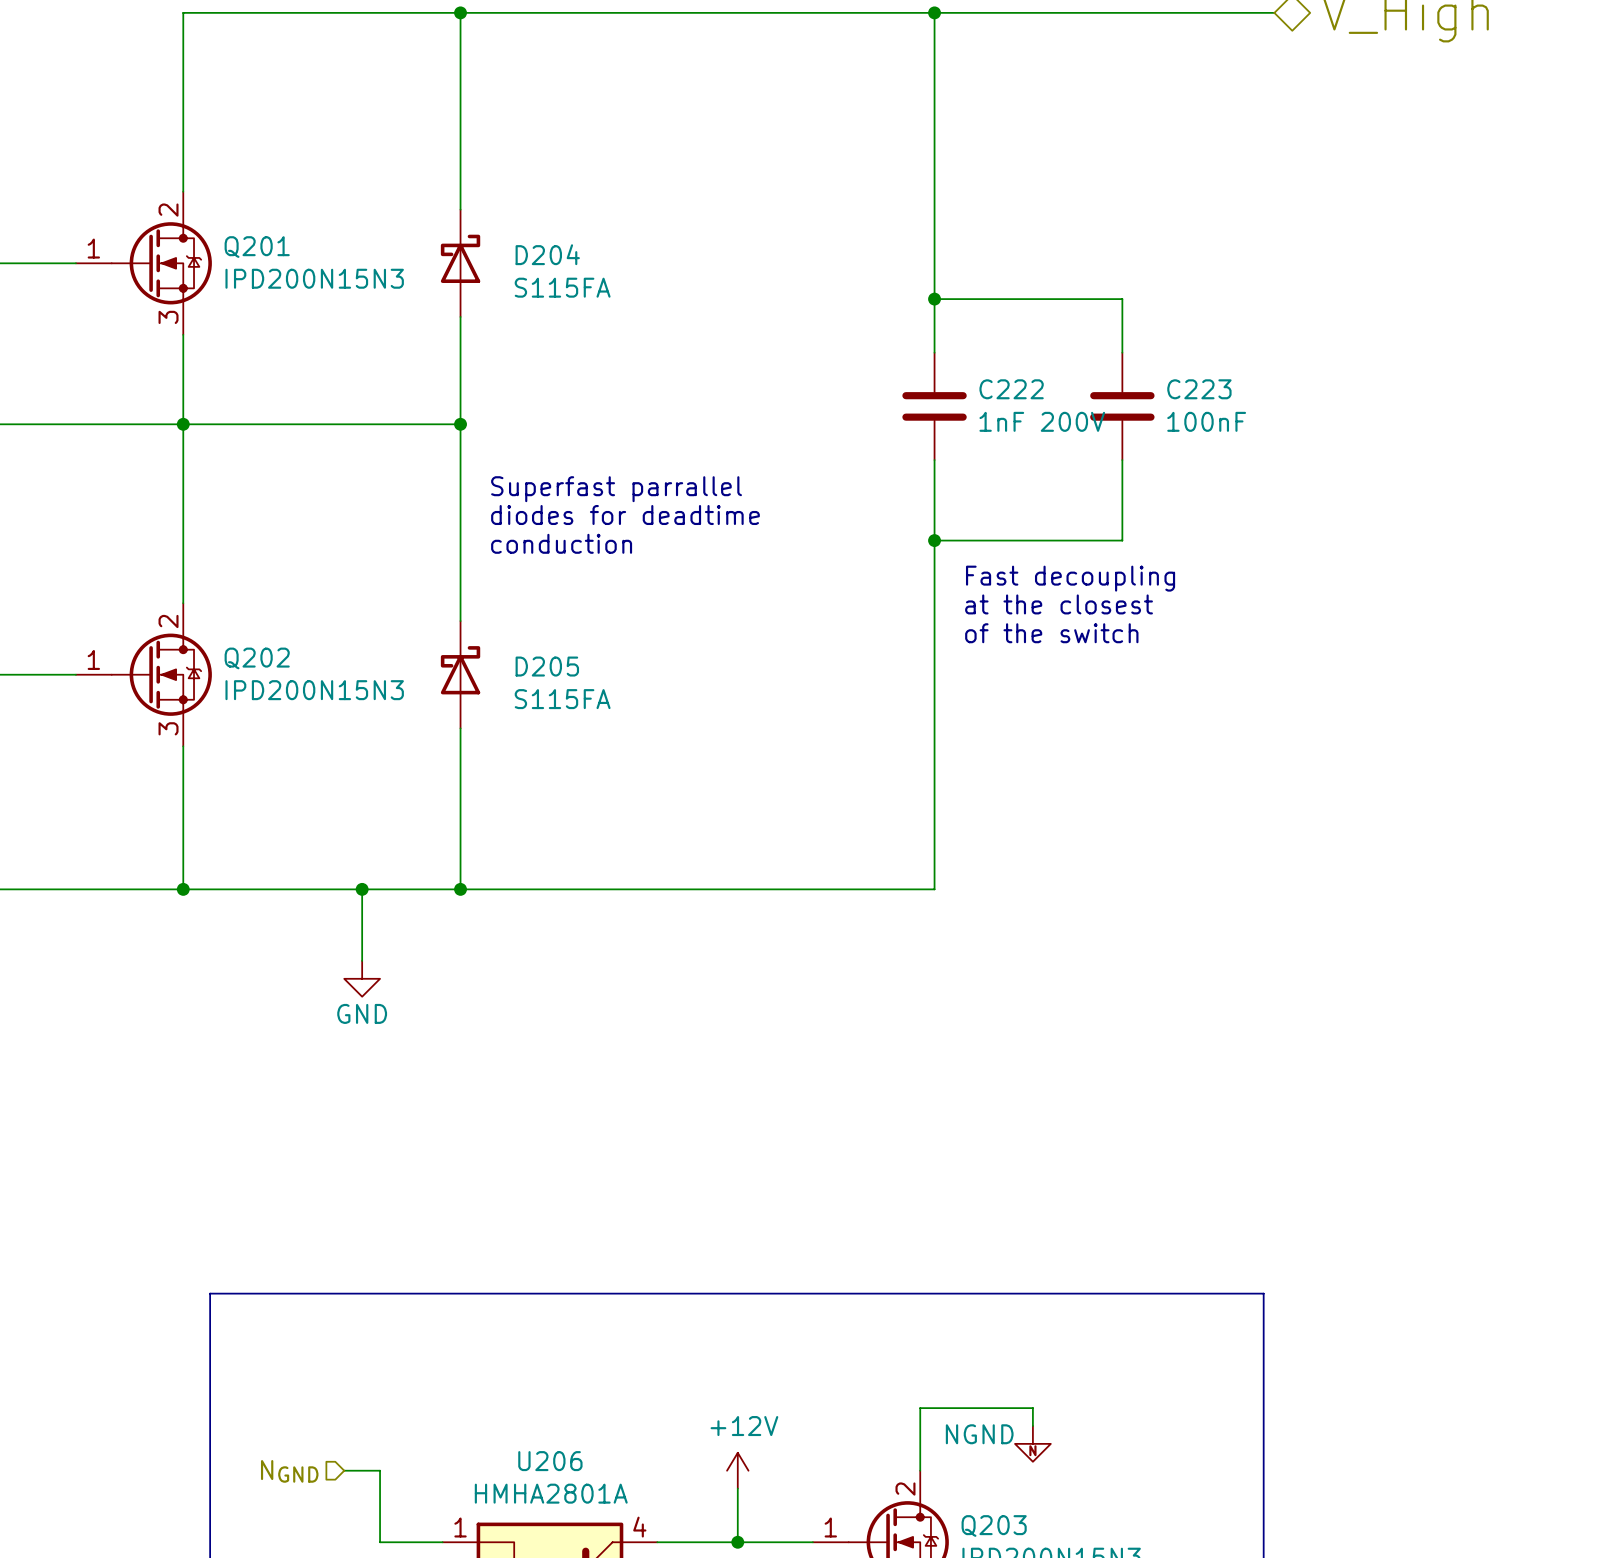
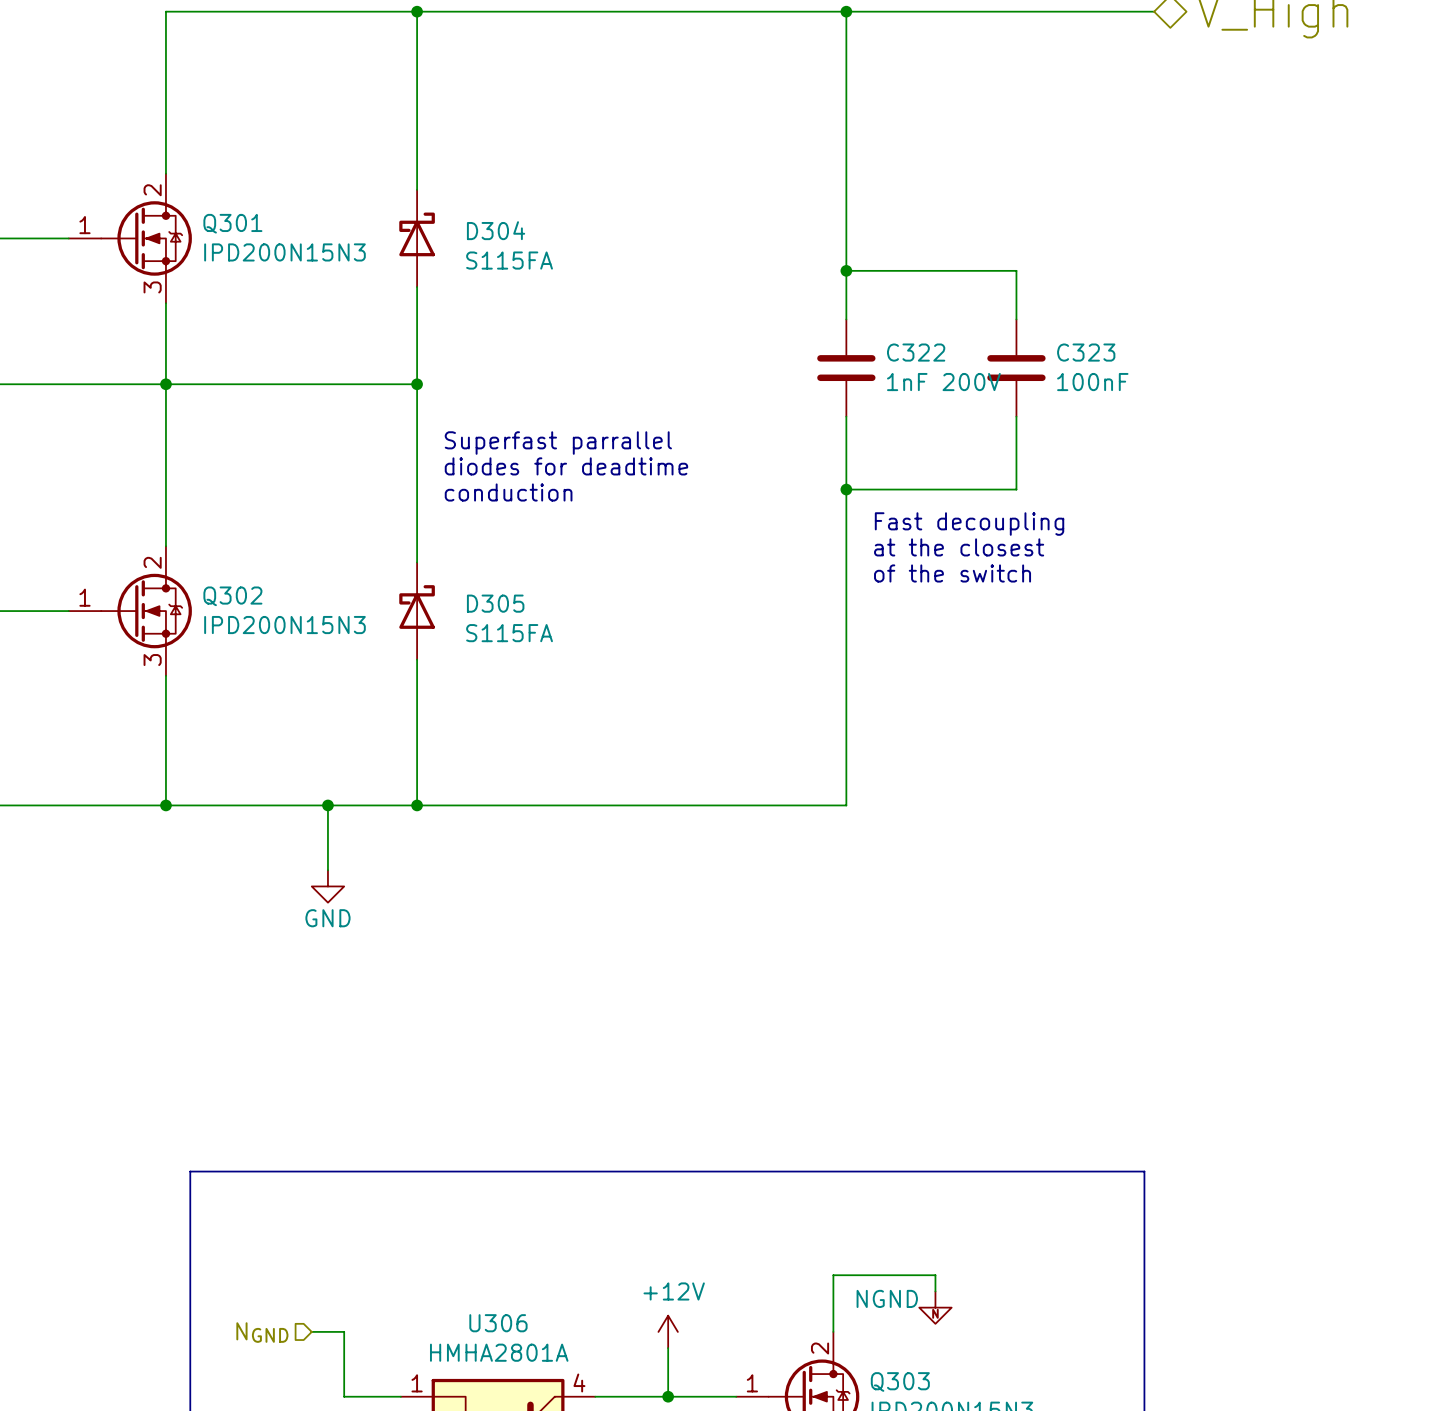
Q201 name: Q201 (257, 247) -> Q301 (232, 223)
D204 name: D204 (547, 254) -> D304 (496, 230)
C222 name: C222 (1011, 389) -> C322 (916, 352)
C223 name: C223 (1199, 389) -> C323 (1086, 352)
Q202 name: Q202 (257, 658) -> Q302 (232, 596)
D205 name: D205 (547, 666) -> D305 (495, 603)
U206 name: U206 (550, 1461) -> U306 (498, 1323)
Q203 name: Q203 (994, 1525) -> Q303 (900, 1381)

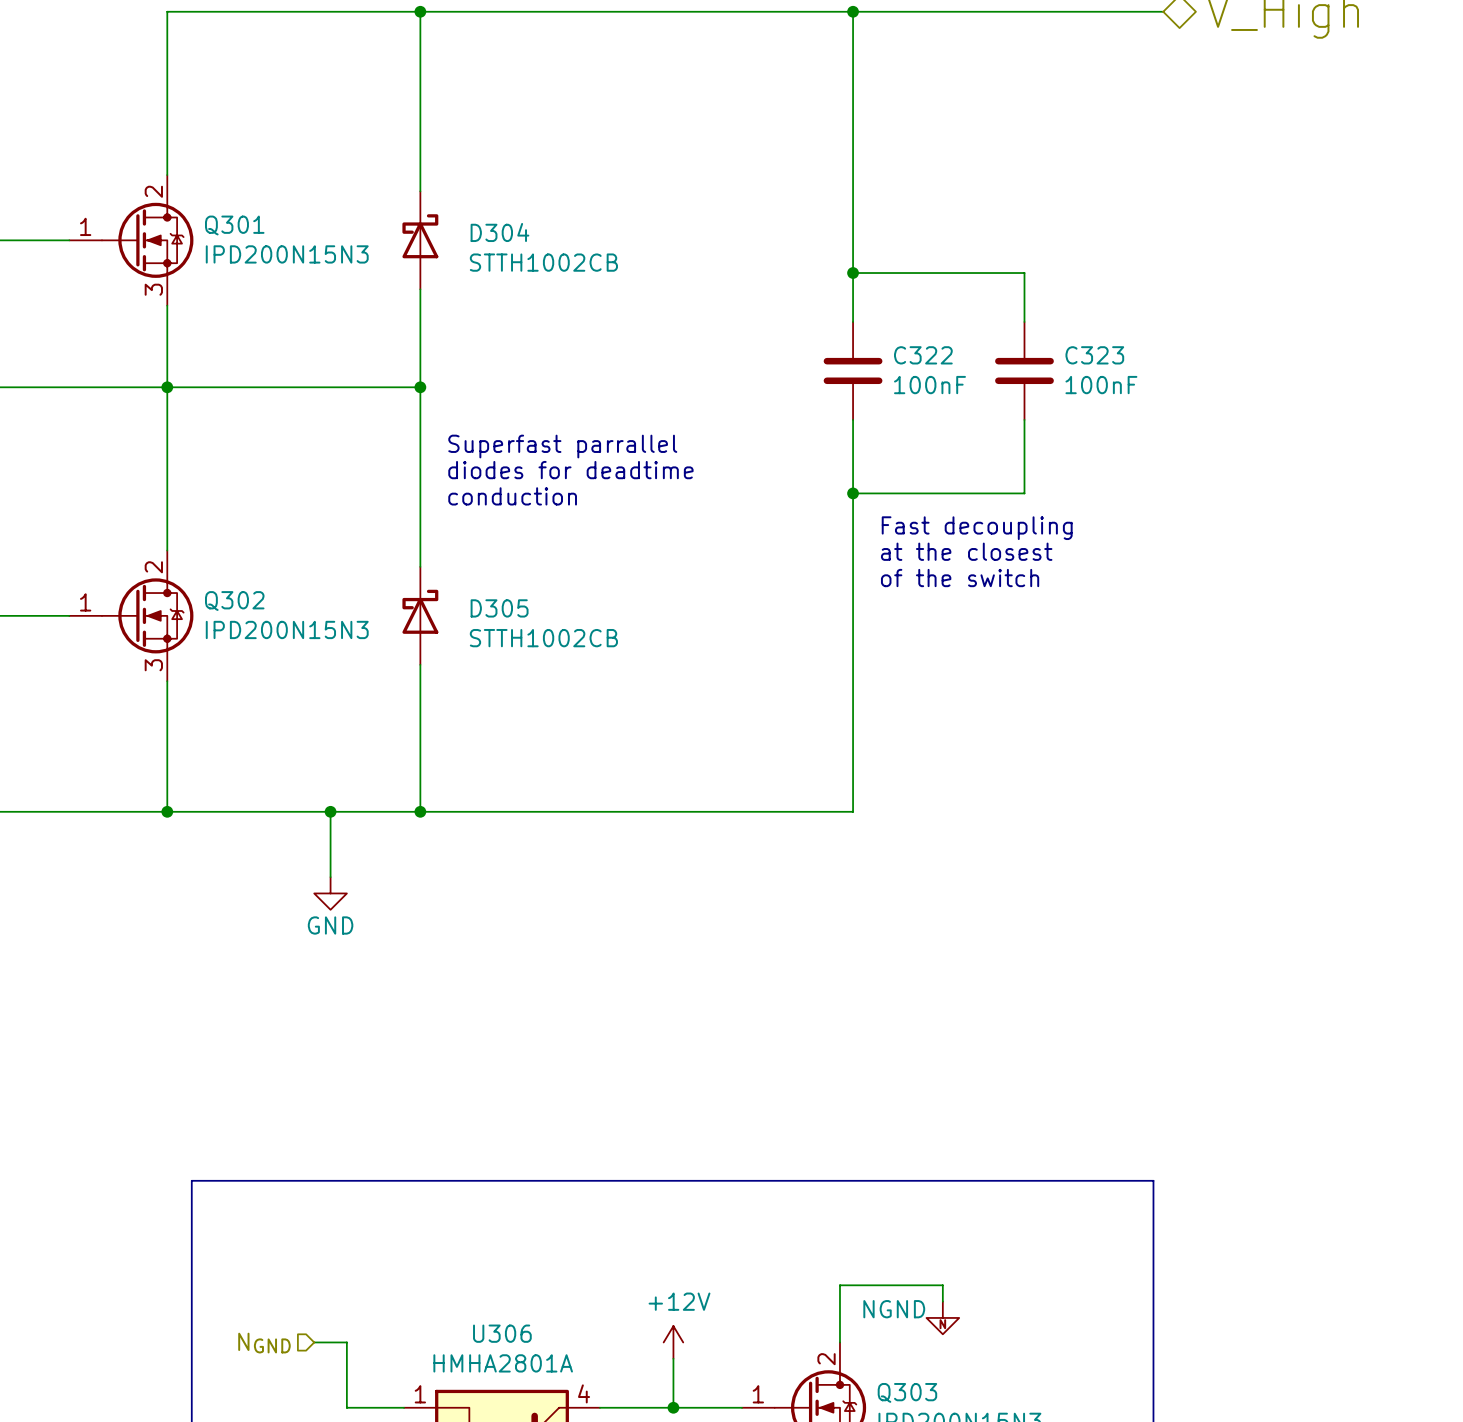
D304 value: S115FA (509, 260) -> STTH1002CB (543, 262)
C322 value: 1nF 200V (943, 382) -> 100nF (929, 385)
D305 value: S115FA (509, 633) -> STTH1002CB (543, 638)

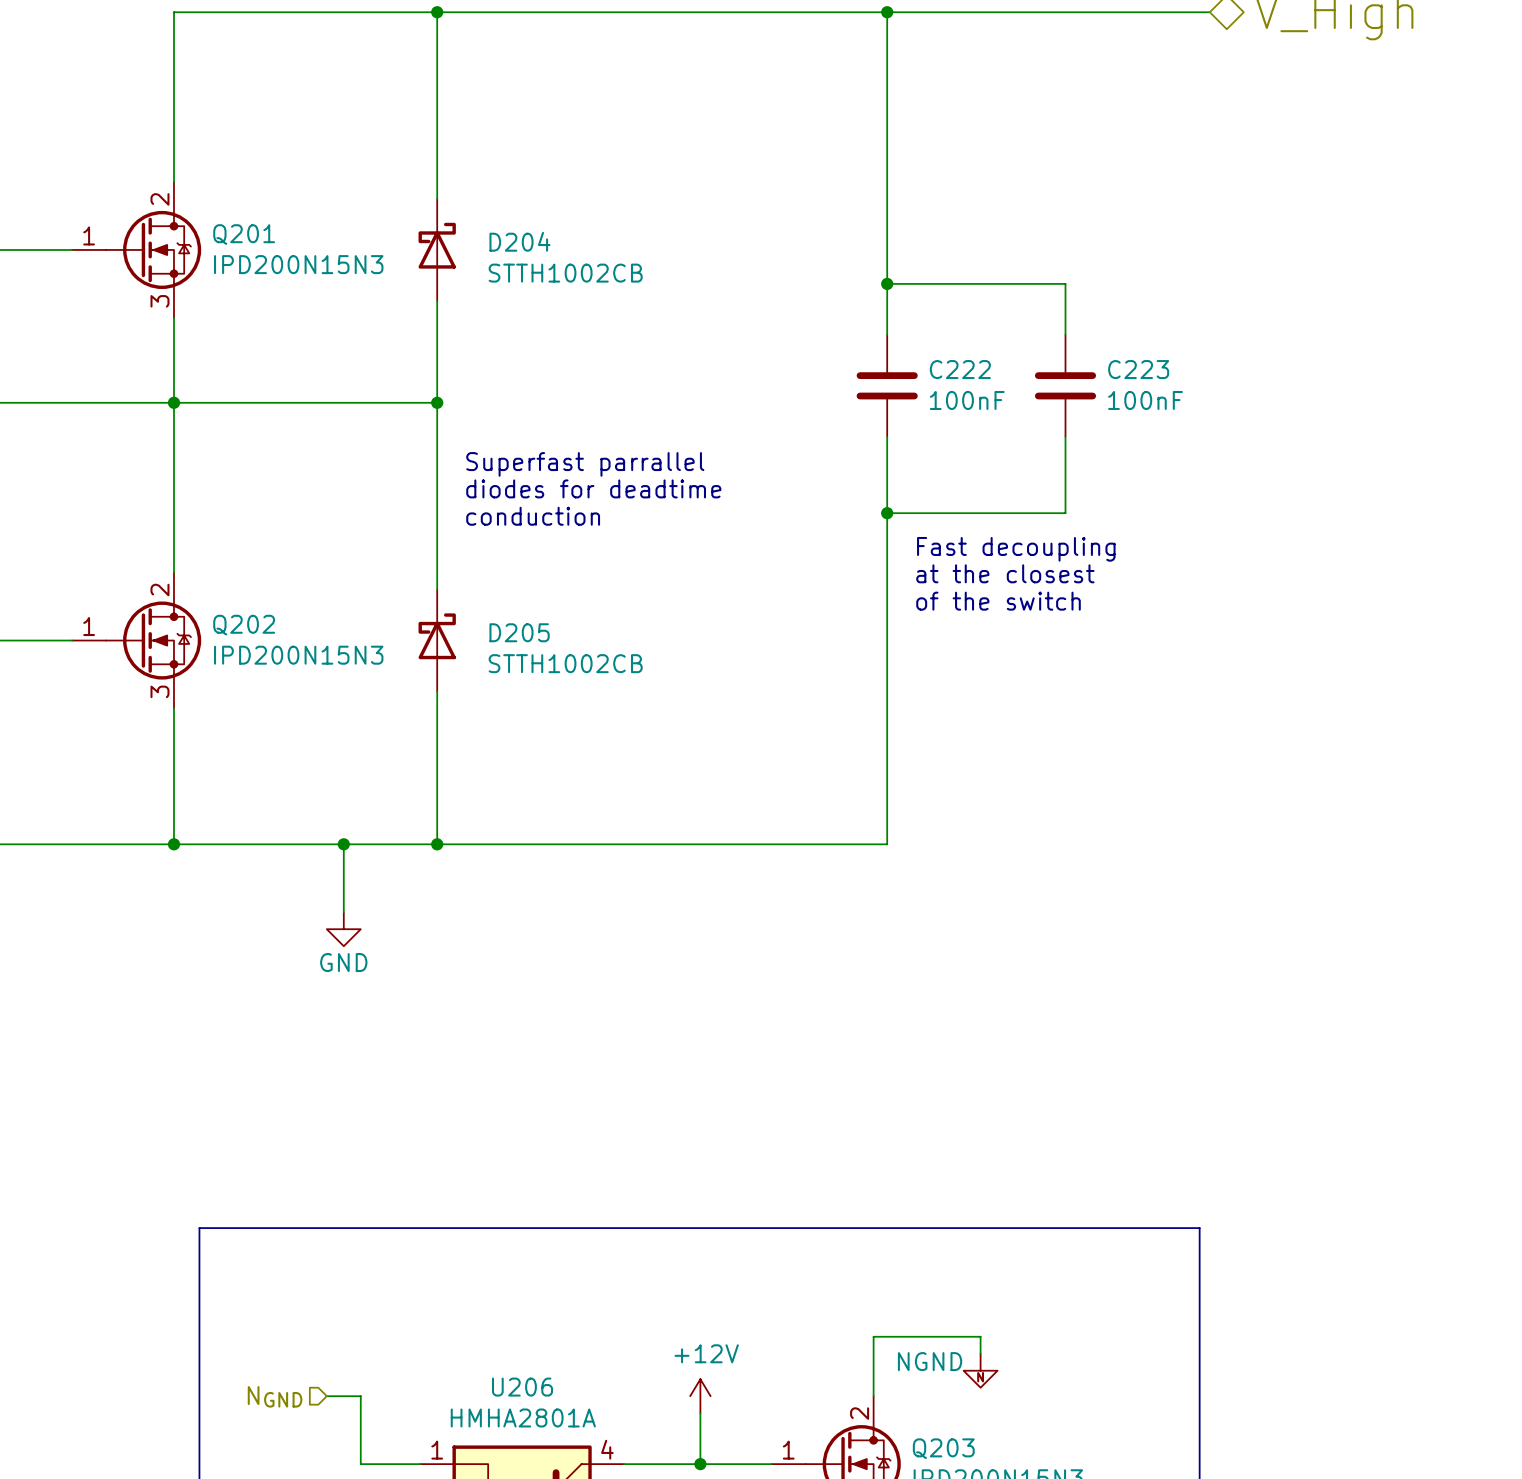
Q301 name: Q301 (234, 225) -> Q201 (244, 234)
D304 name: D304 (499, 232) -> D204 (519, 241)
C322 name: C322 (923, 355) -> C222 (960, 369)
C323 name: C323 (1094, 355) -> C223 (1138, 369)
Q302 name: Q302 (234, 601) -> Q202 (244, 625)
D305 name: D305 (499, 608) -> D205 (519, 632)
U306 name: U306 (502, 1333) -> U206 (522, 1387)
Q303 name: Q303 (907, 1392) -> Q203 (943, 1448)

